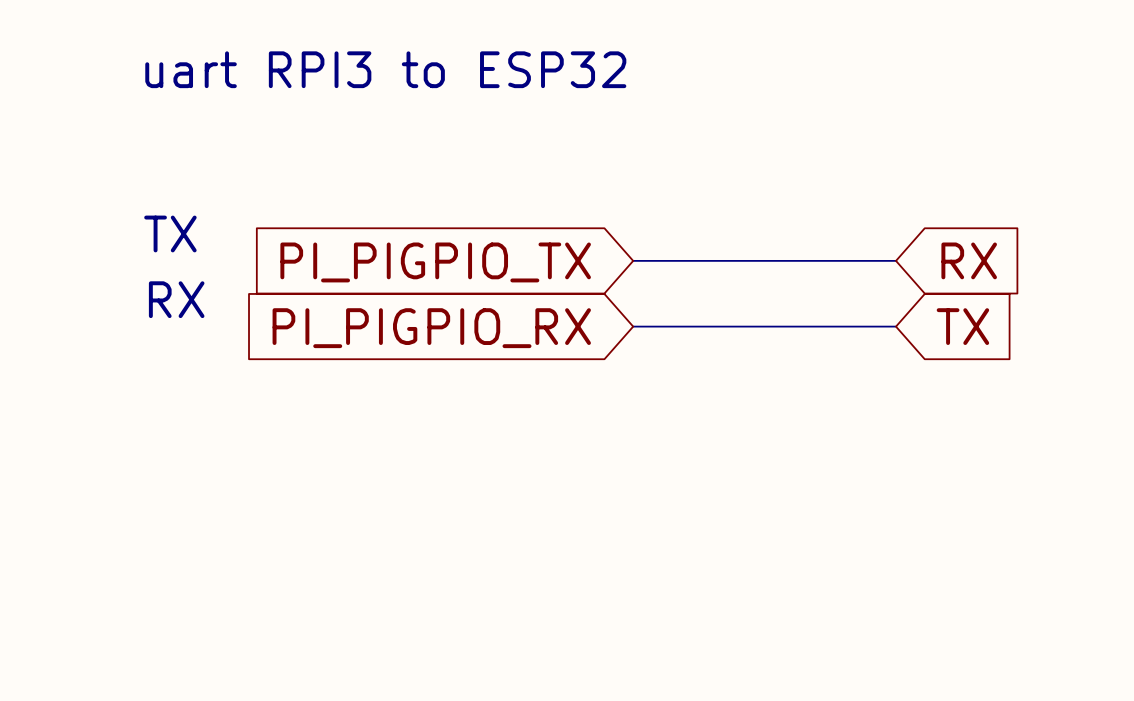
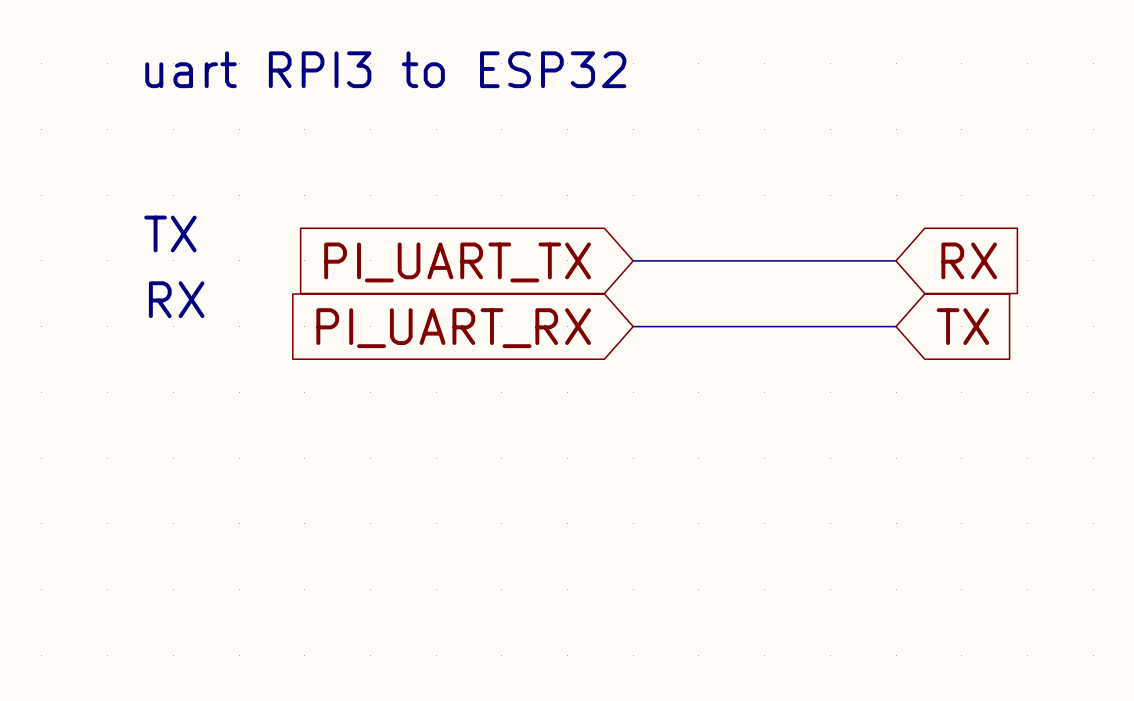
global label: PI_PIGPIO_TX (435, 262) -> PI_UART_TX (457, 262)
global label: PI_PIGPIO_RX (431, 328) -> PI_UART_RX (453, 328)

